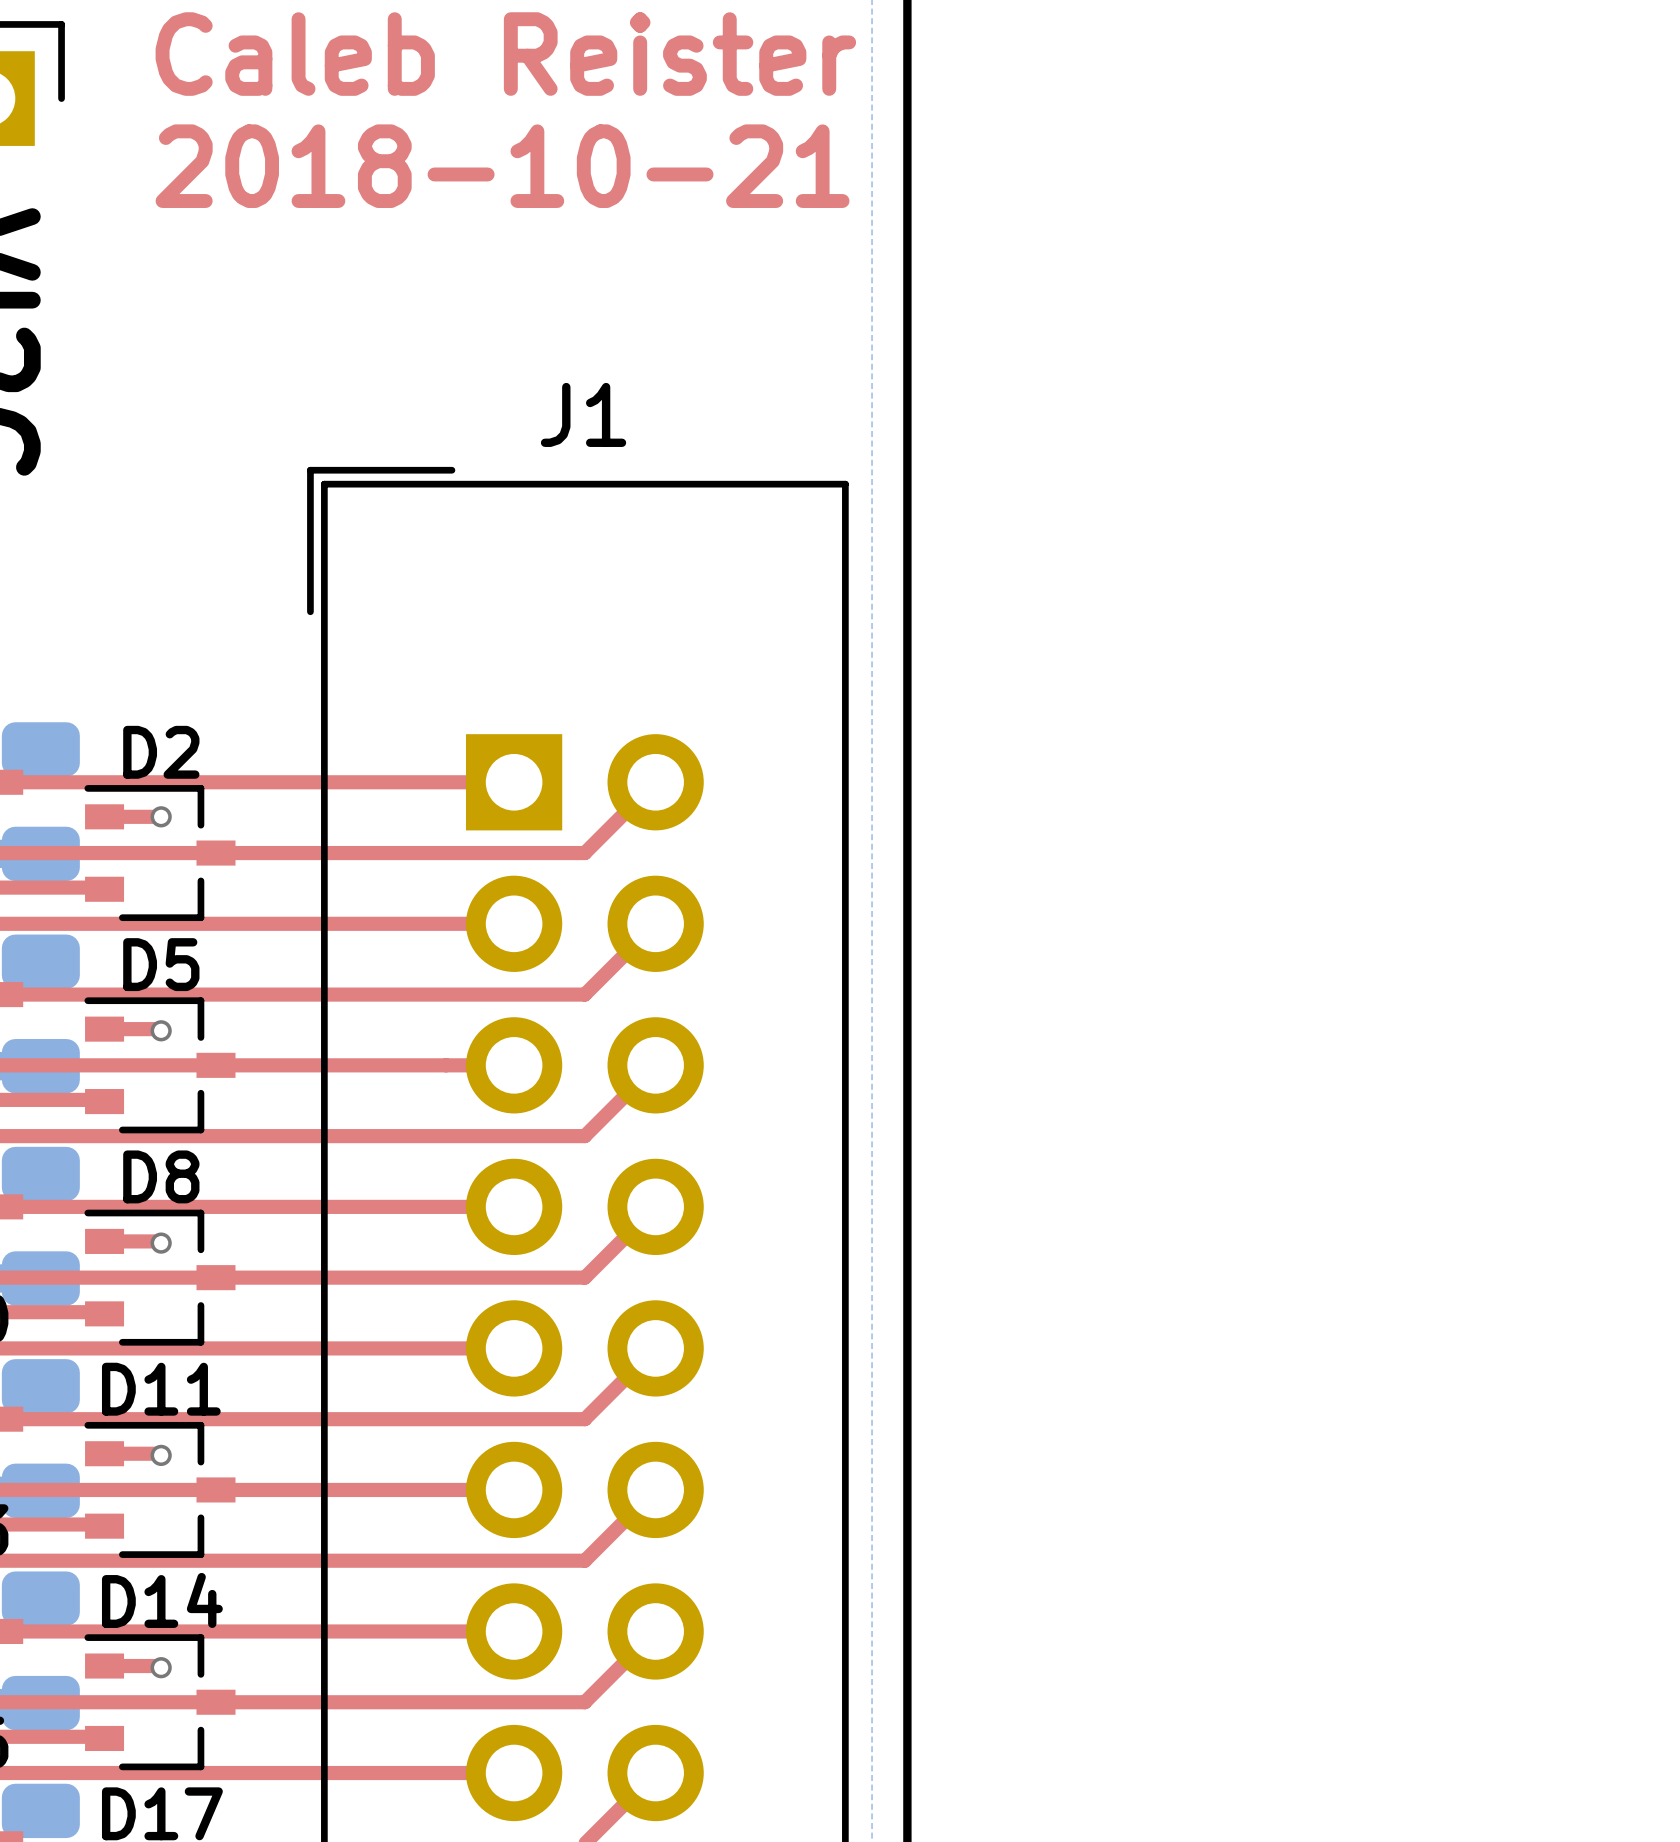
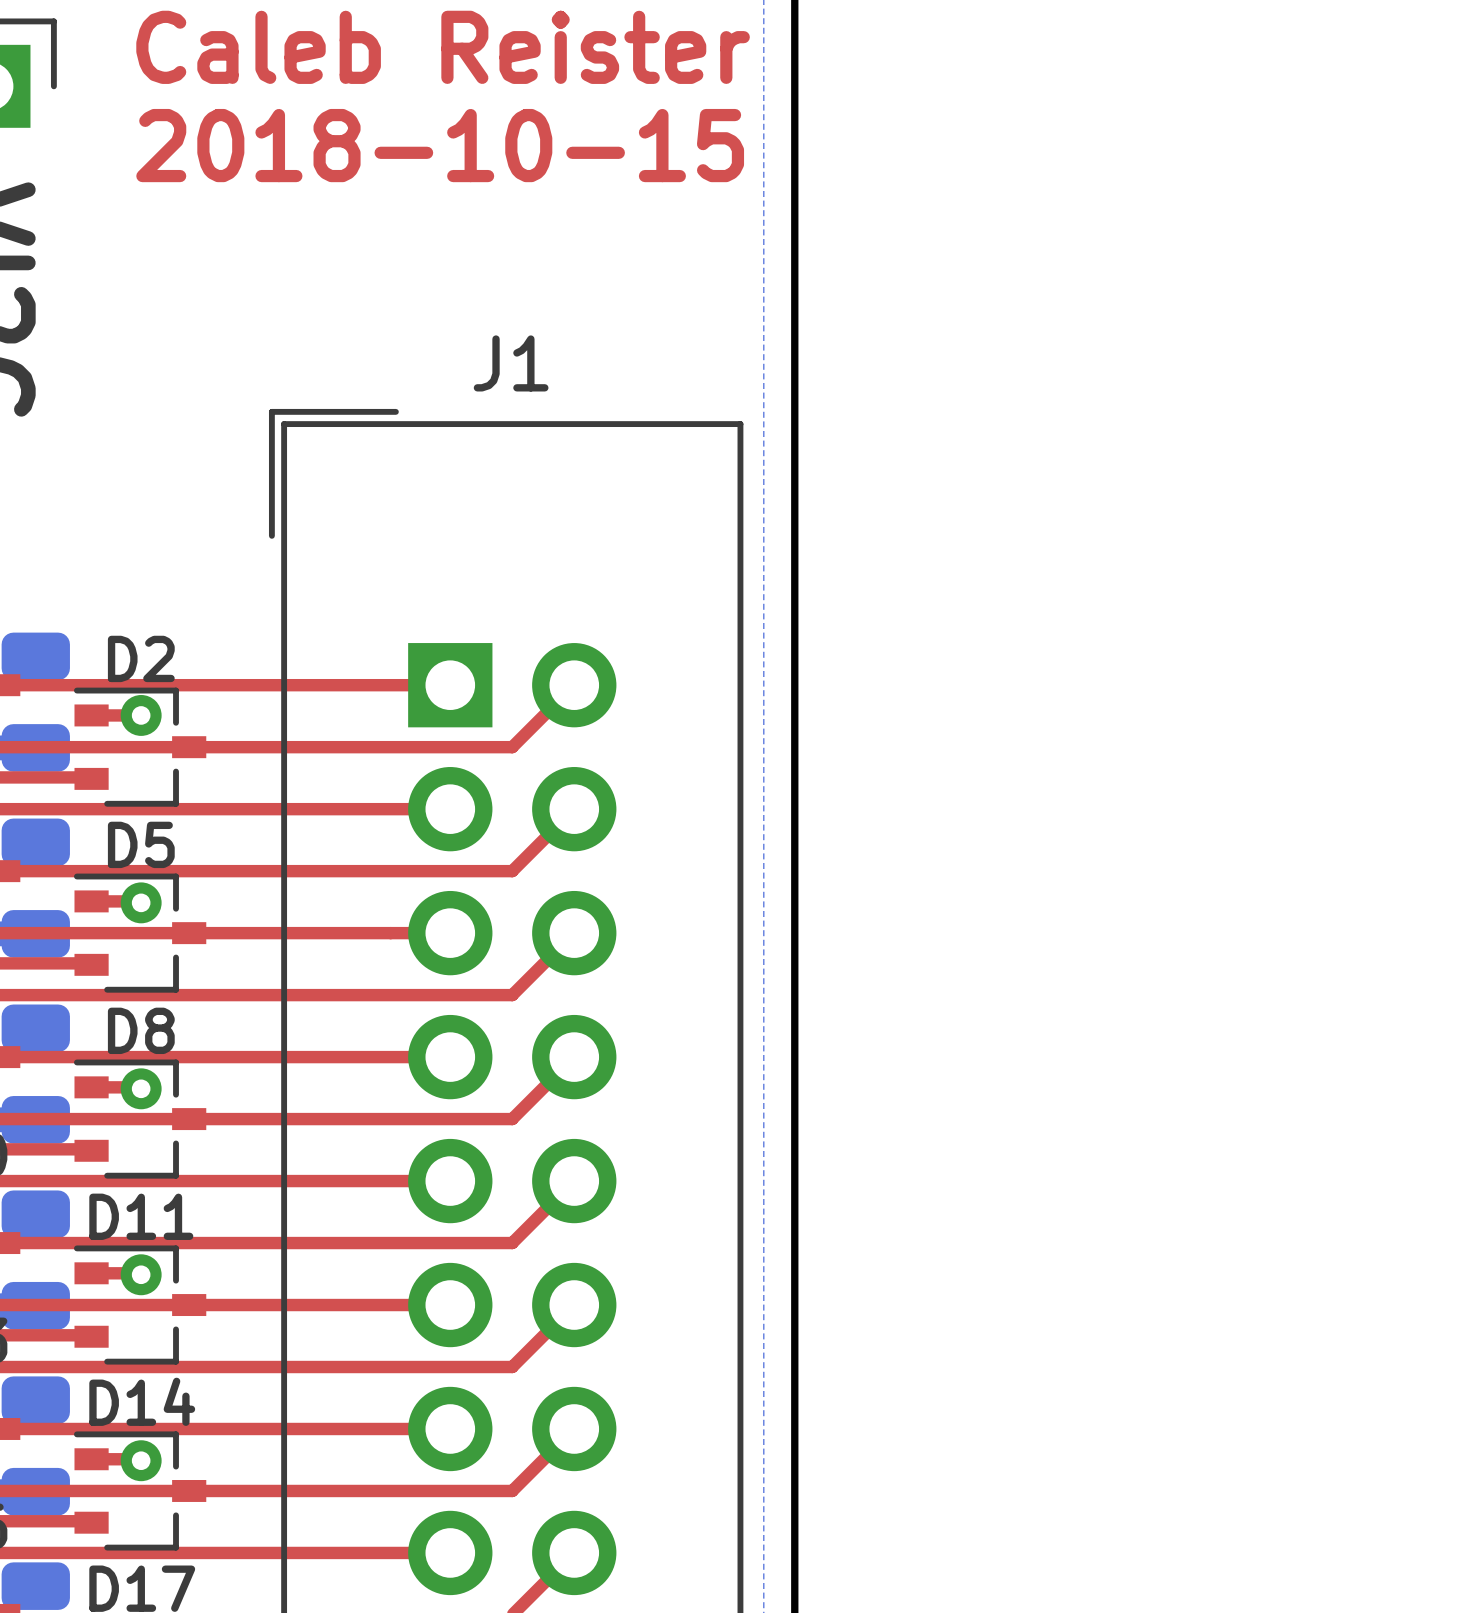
text: 2018-10-21 (502, 166) -> 2018-10-15 (440, 145)
via size: [150, 806, 172, 828] -> [120, 694, 162, 736]
via size: [150, 1020, 172, 1042] -> [120, 882, 162, 924]
via size: [150, 1232, 172, 1254] -> [120, 1068, 162, 1110]
via size: [150, 1444, 172, 1467] -> [120, 1254, 162, 1296]
via size: [150, 1657, 172, 1679] -> [120, 1440, 162, 1482]

